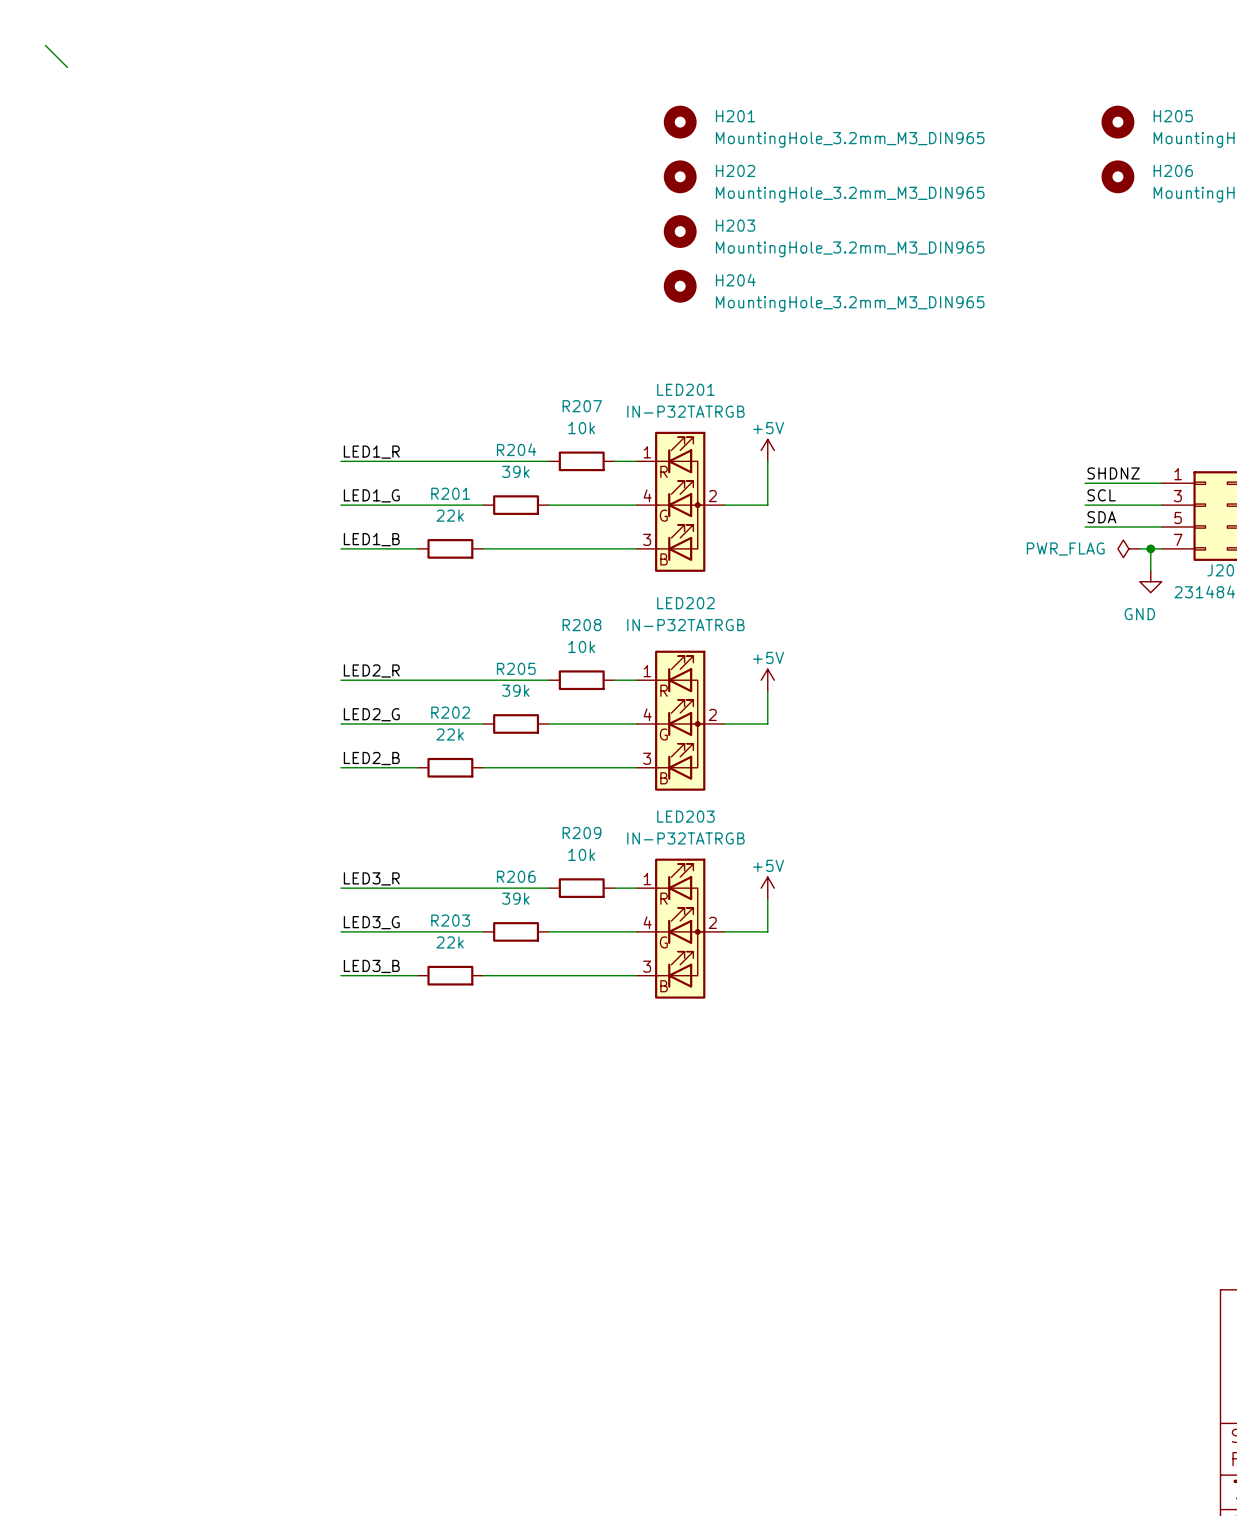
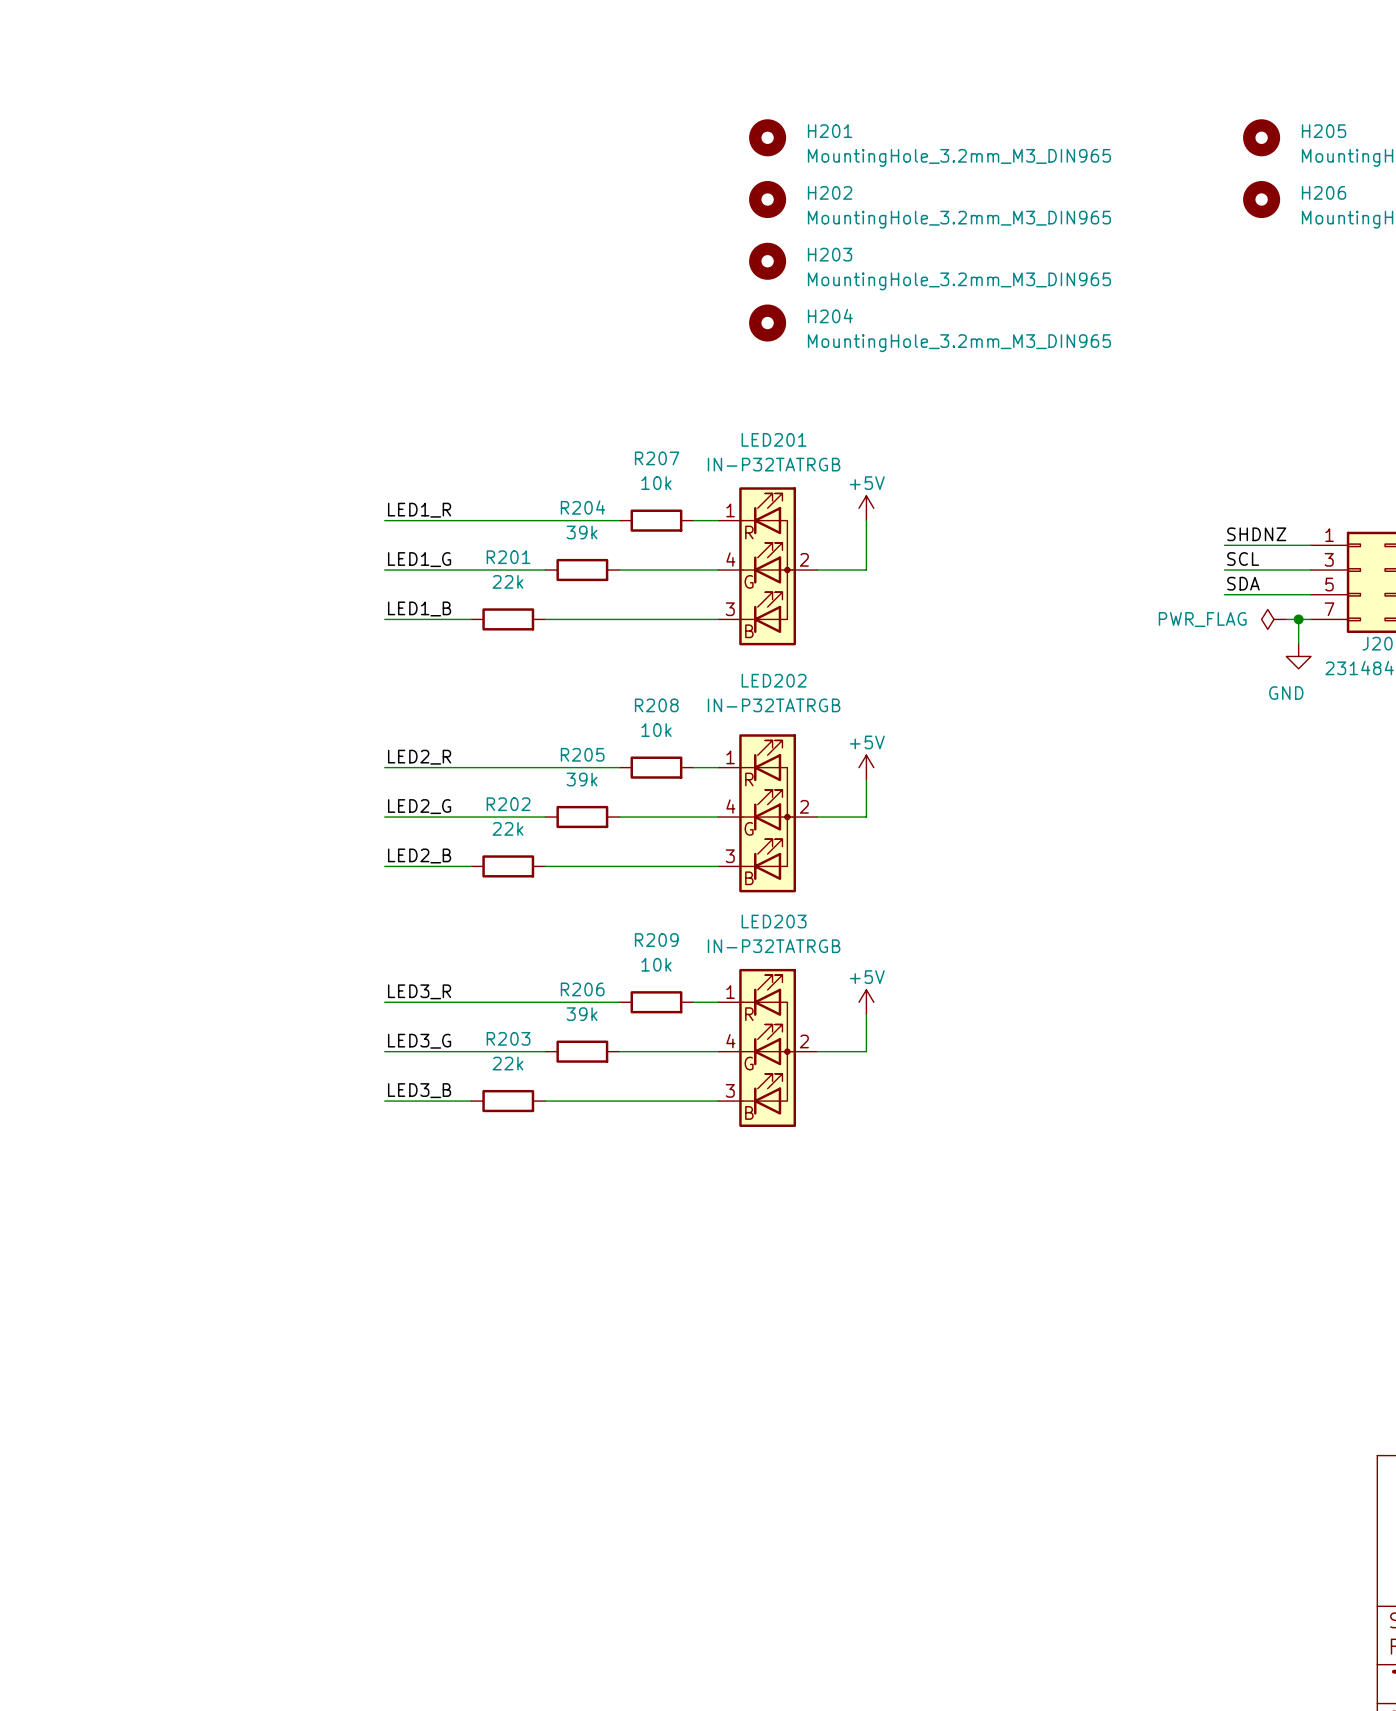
wire: (45, 45) (67, 67) -> none

